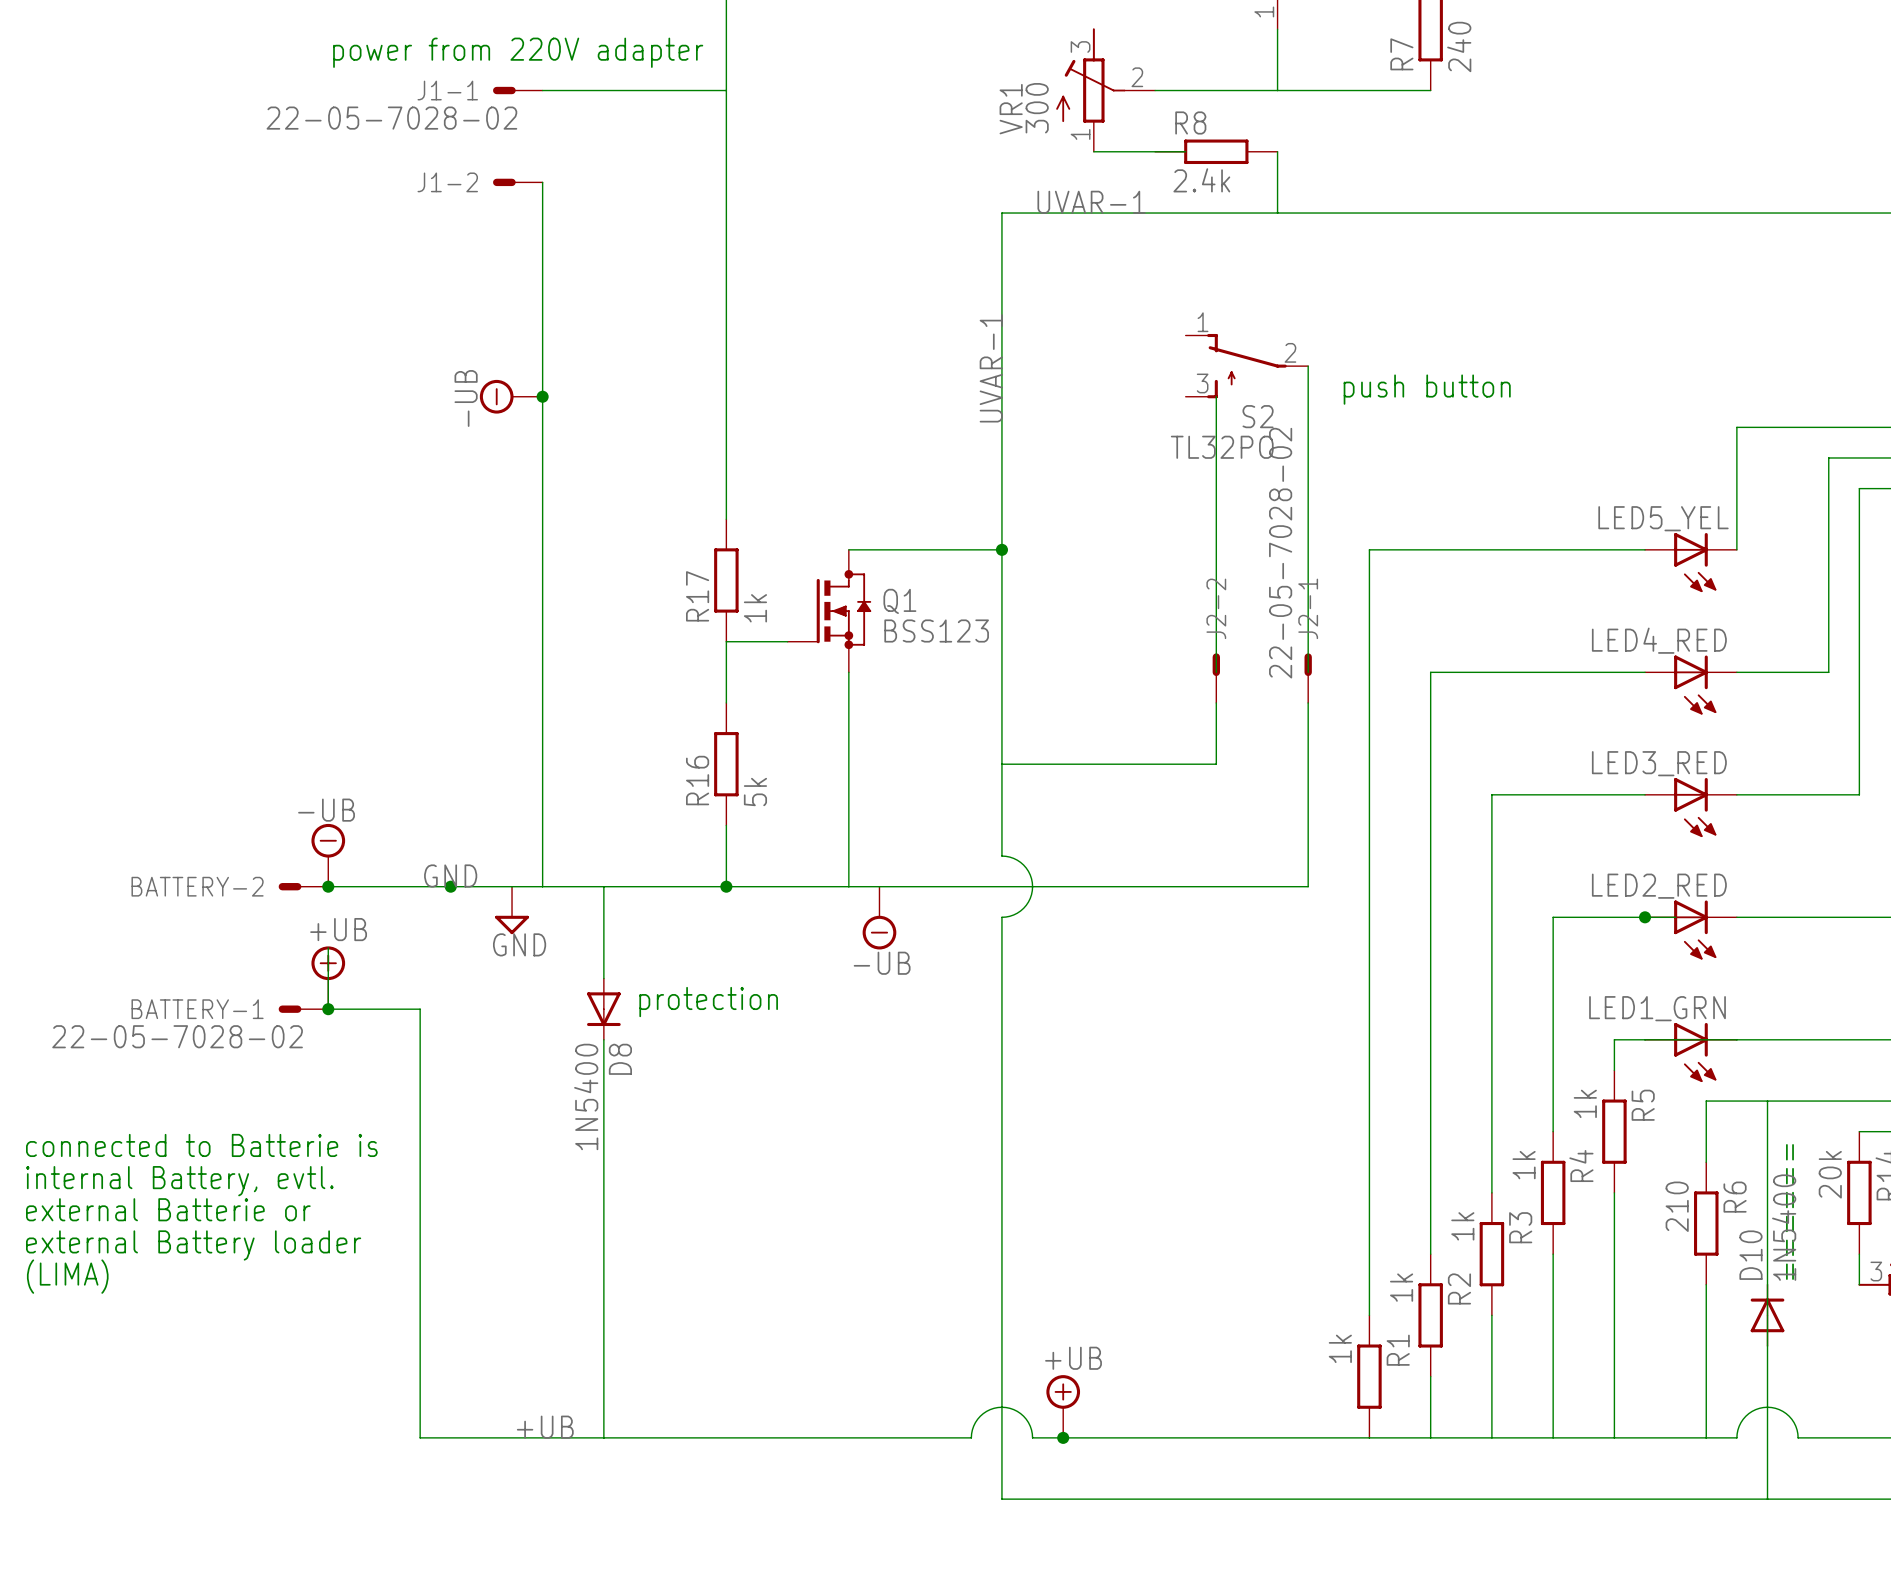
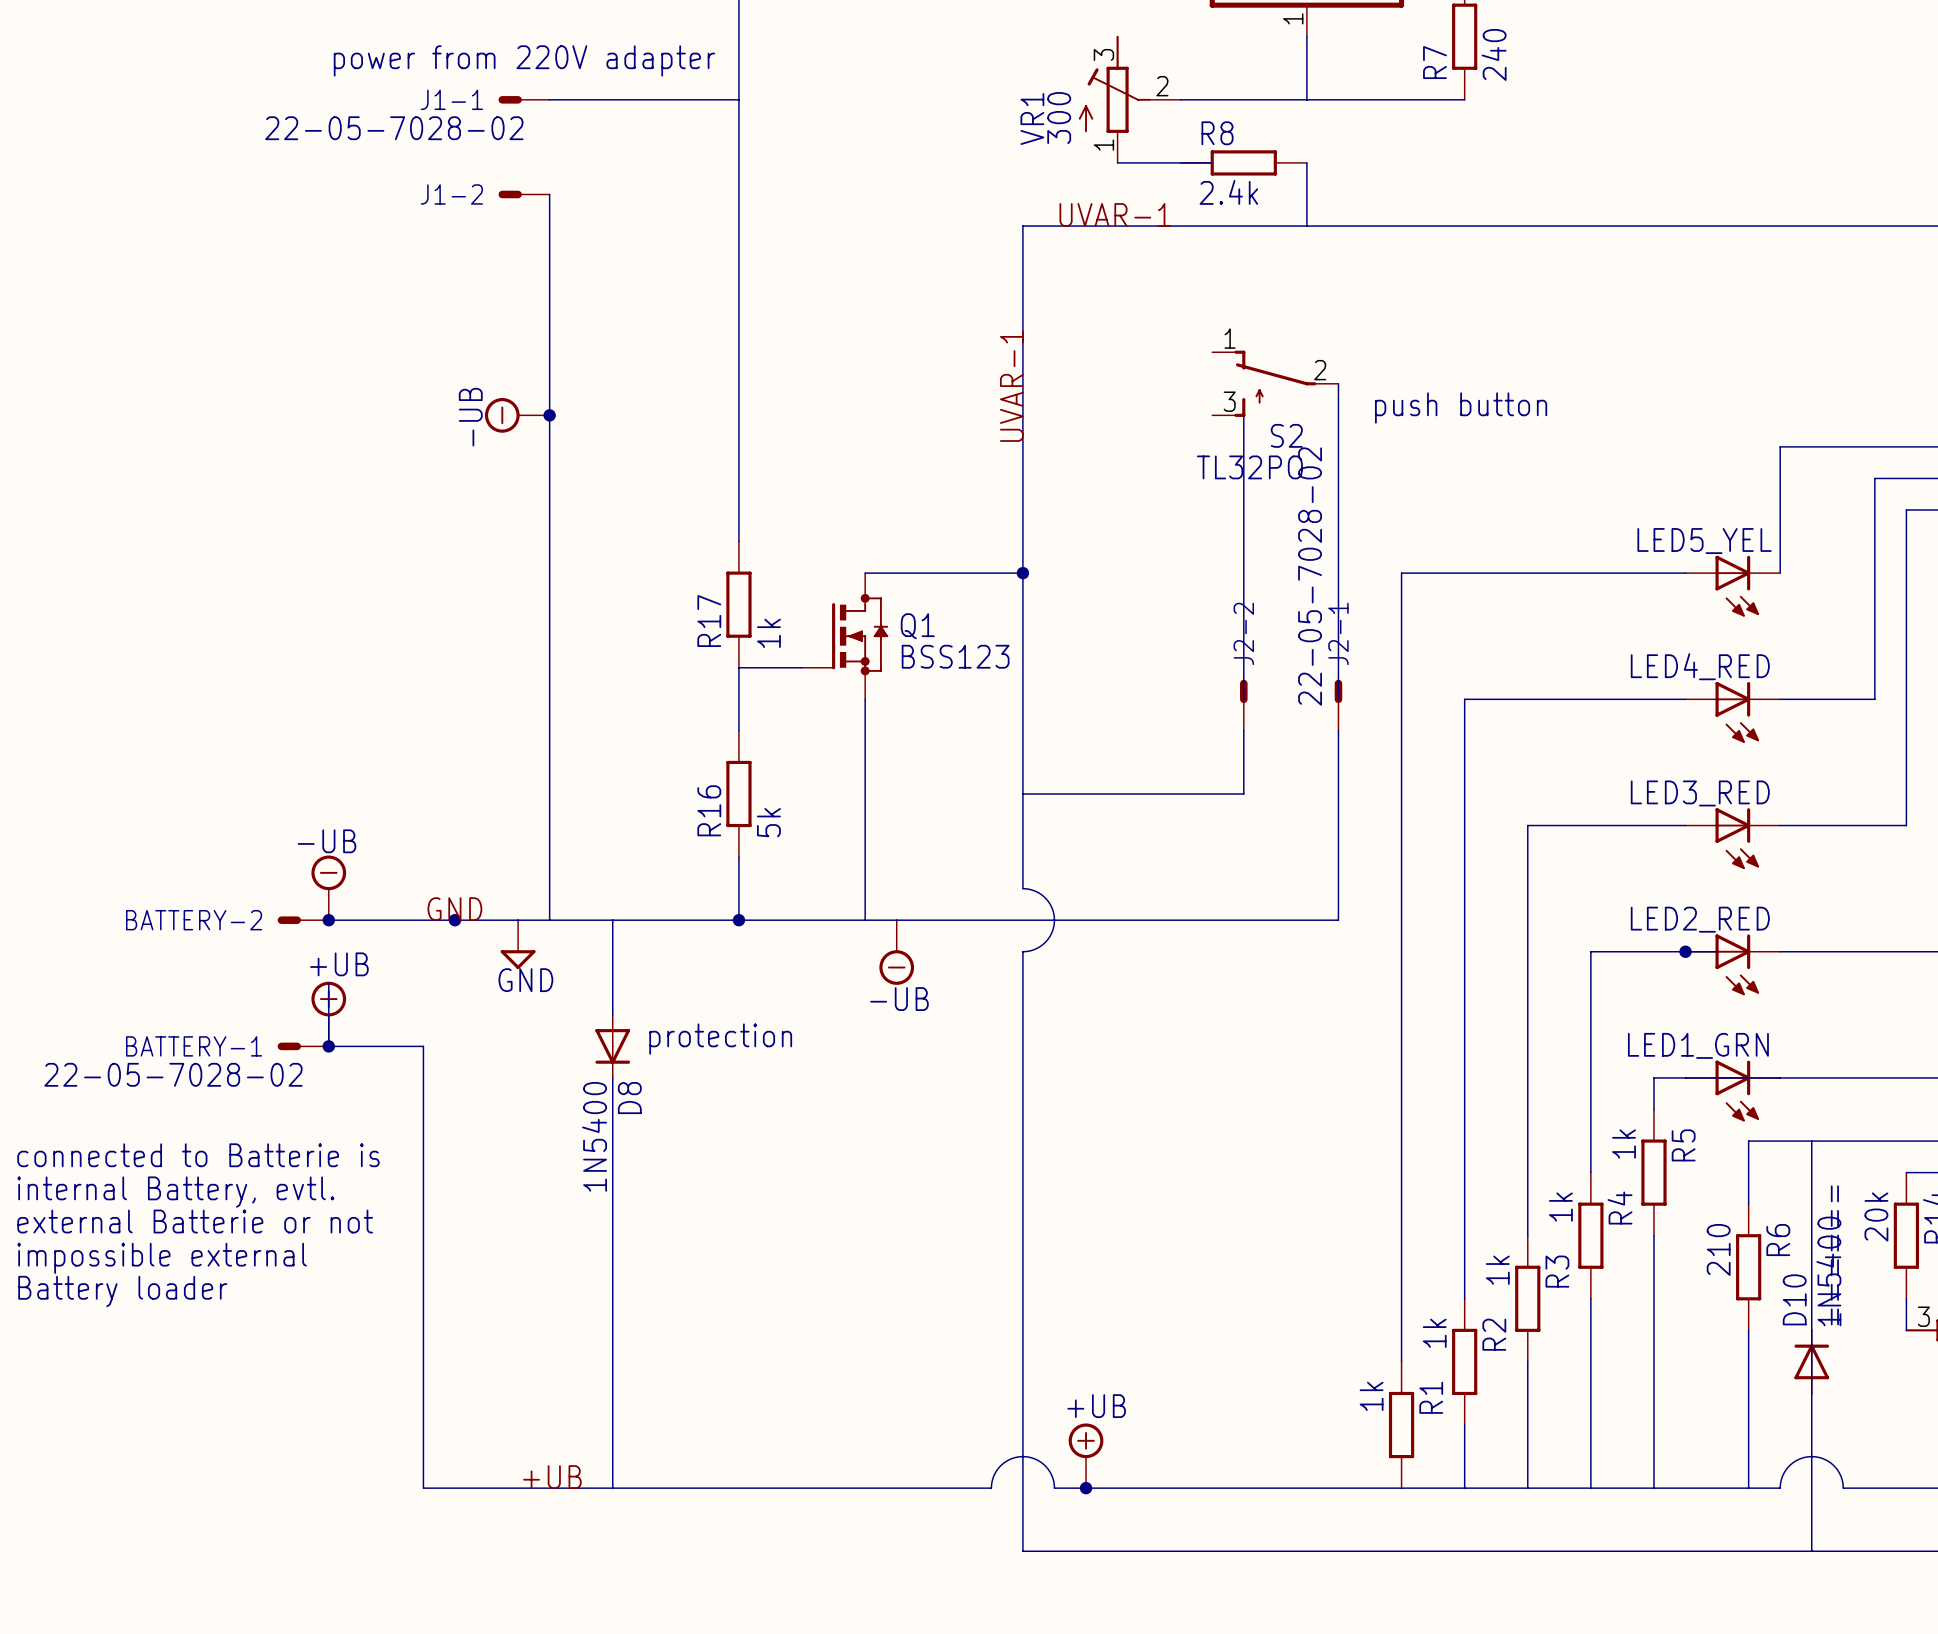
text: none -> connected to Batterie is (198, 1155)
text: connected to Batterie is (201, 1145) -> internal Battery, evtl. (175, 1192)
text: internal Battery, evtl. (179, 1181) -> external Batterie or not (195, 1221)
text: external Batterie or (168, 1209) -> impossible external (162, 1258)
text: external Battery loader (193, 1245) -> Battery loader (122, 1291)
text: (LIMA) (67, 1276) -> none

